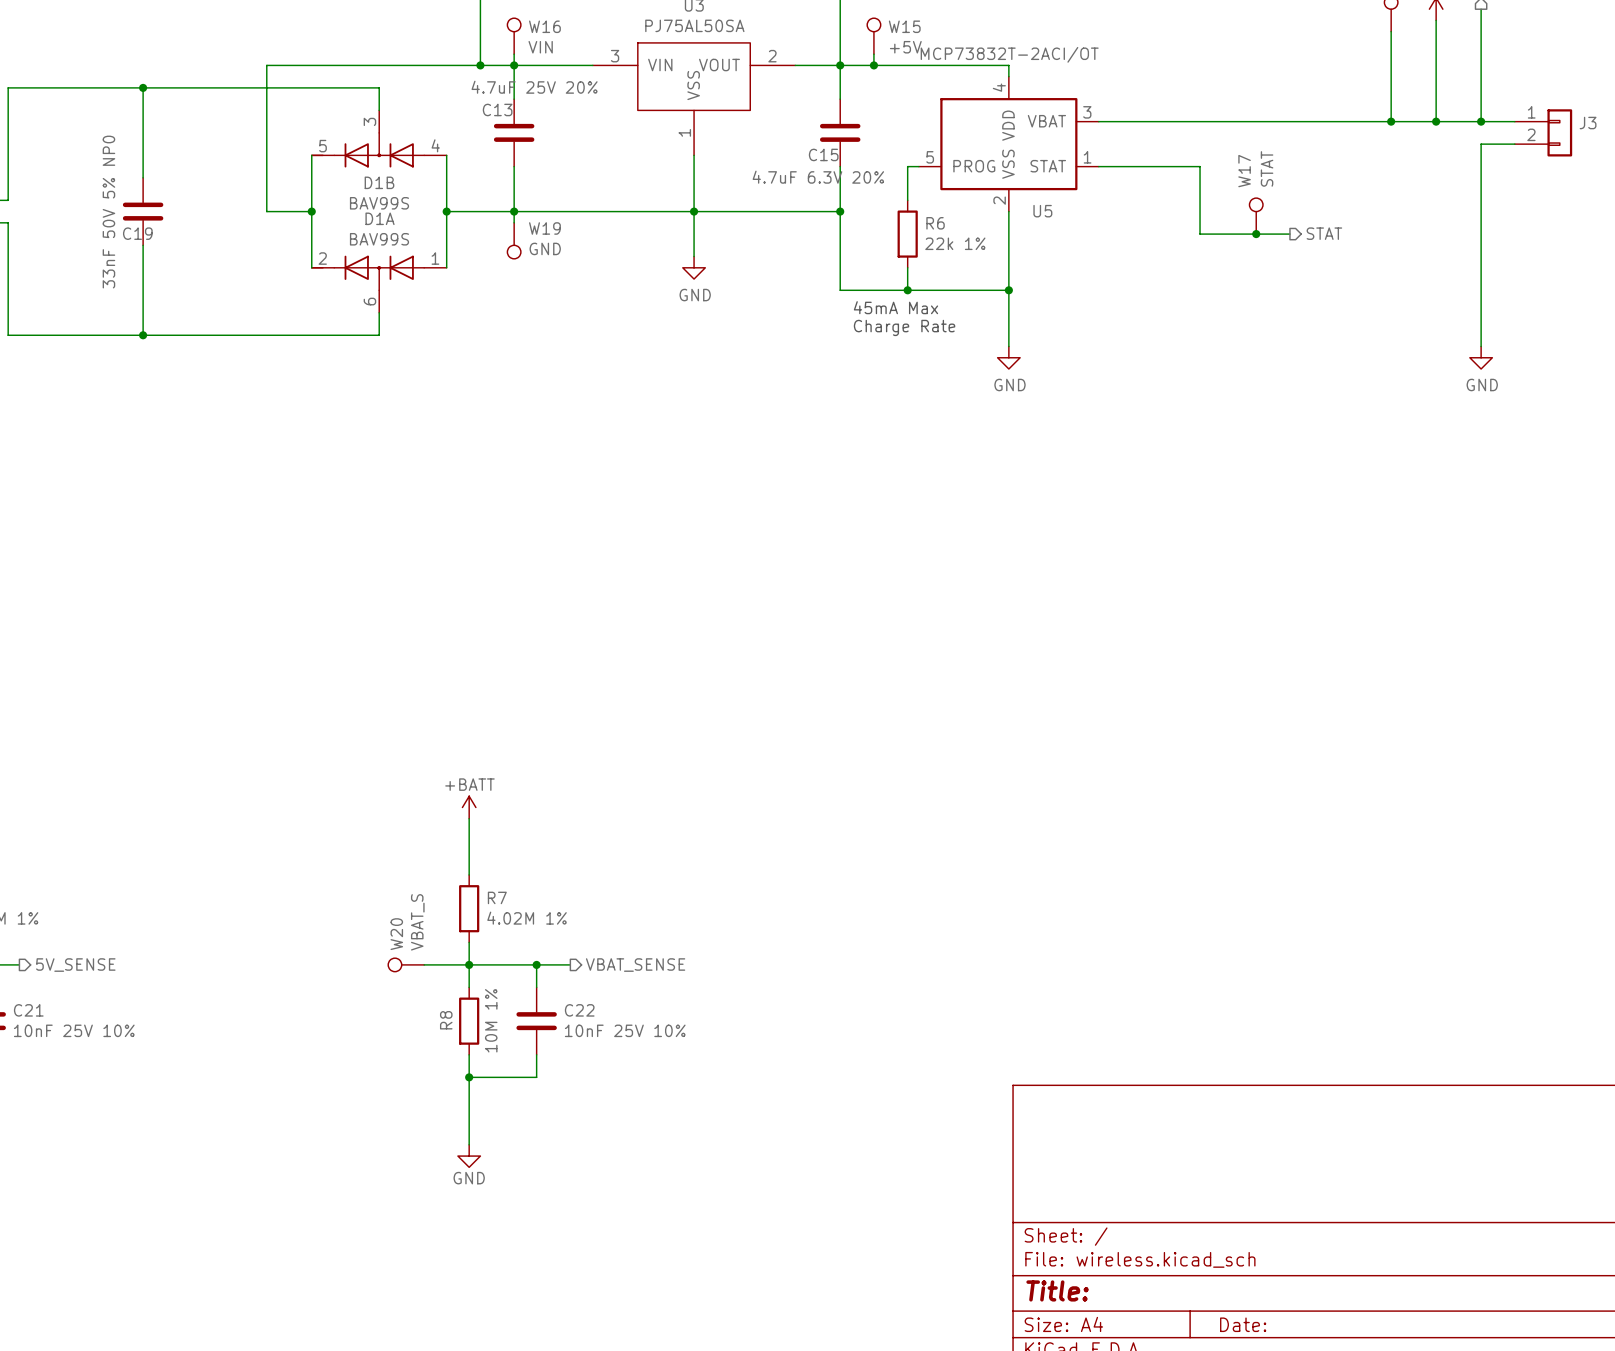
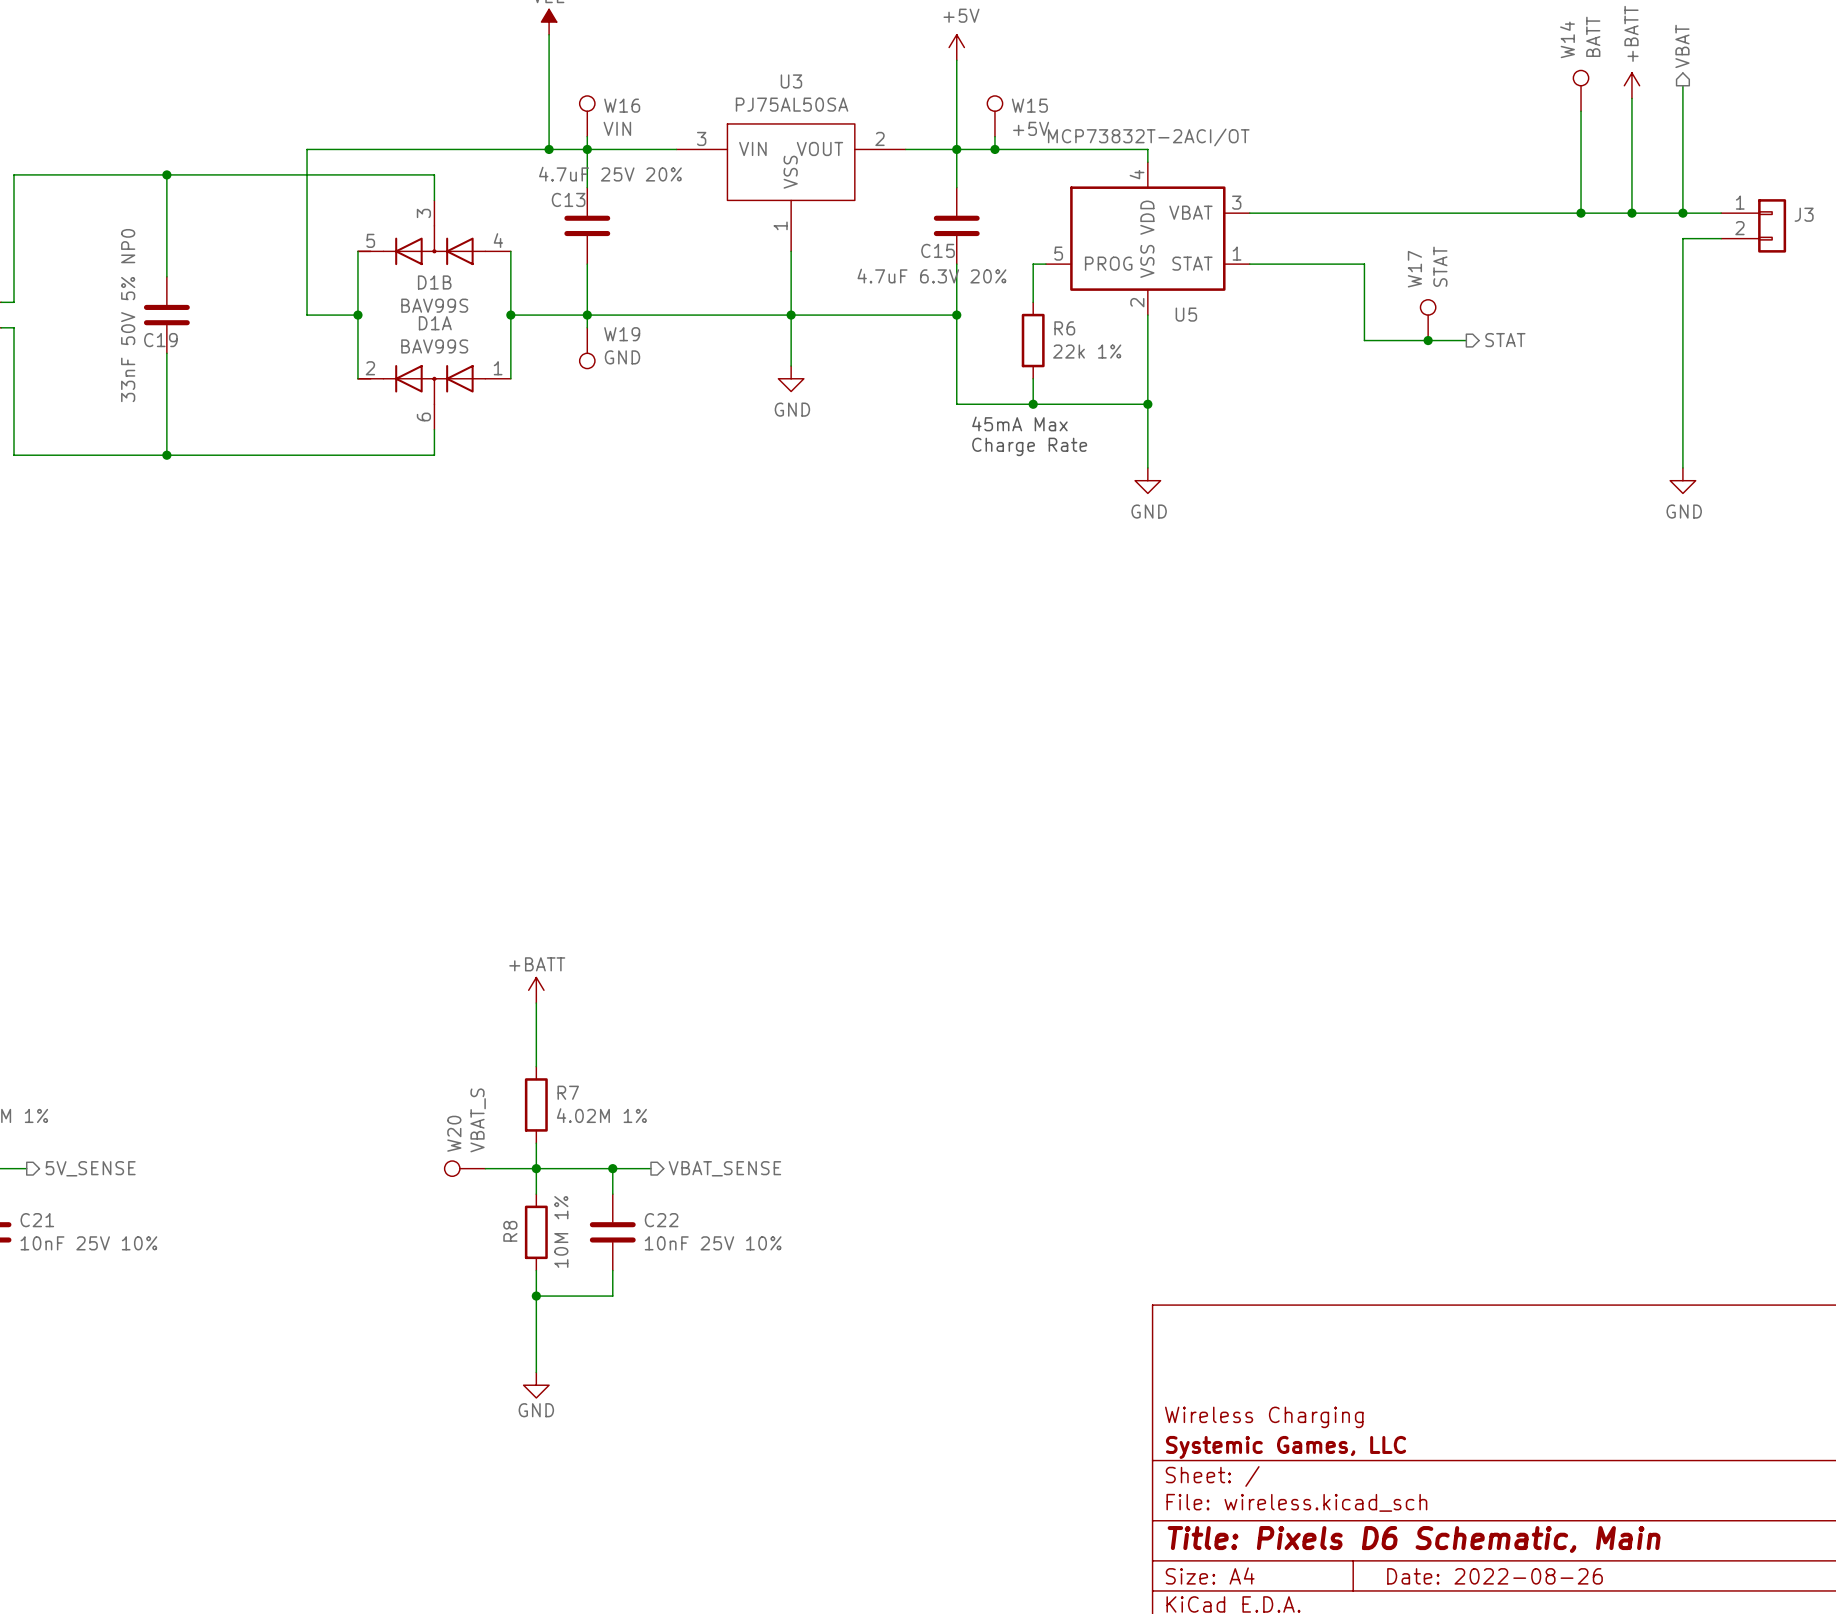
title block: none -> Wireless Charging (1264, 1417)
title block: none -> Systemic Games, LLC (1286, 1447)
title block: Title: (1057, 1290) -> Title: Pixels D6 Schematic, Main (1414, 1539)
title block: Date: (1243, 1324) -> Date: 2022-08-26 (1495, 1576)

